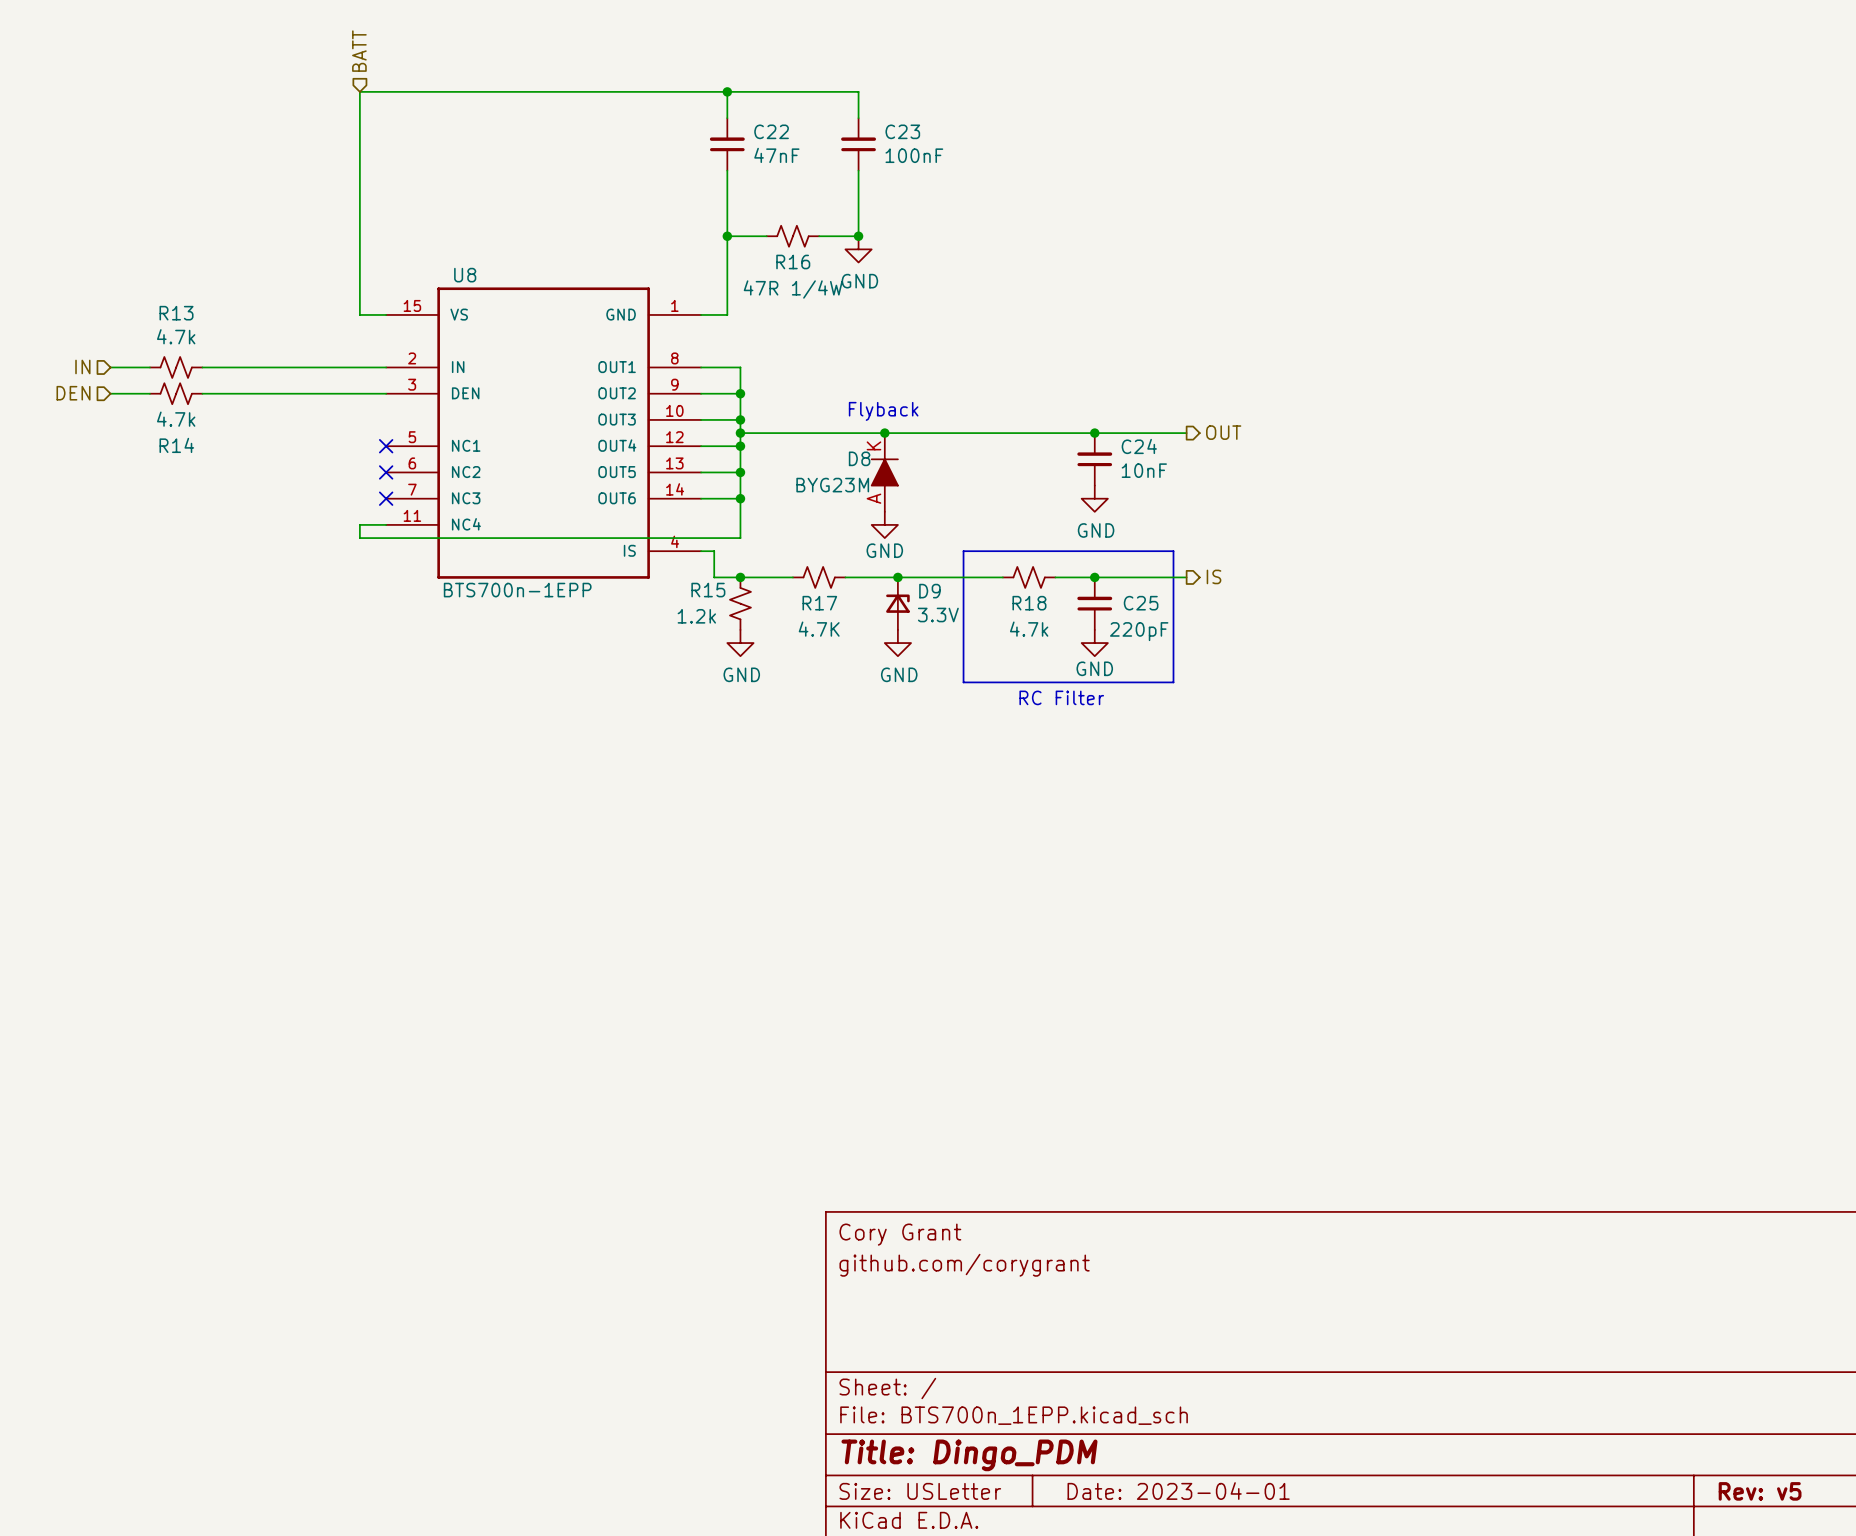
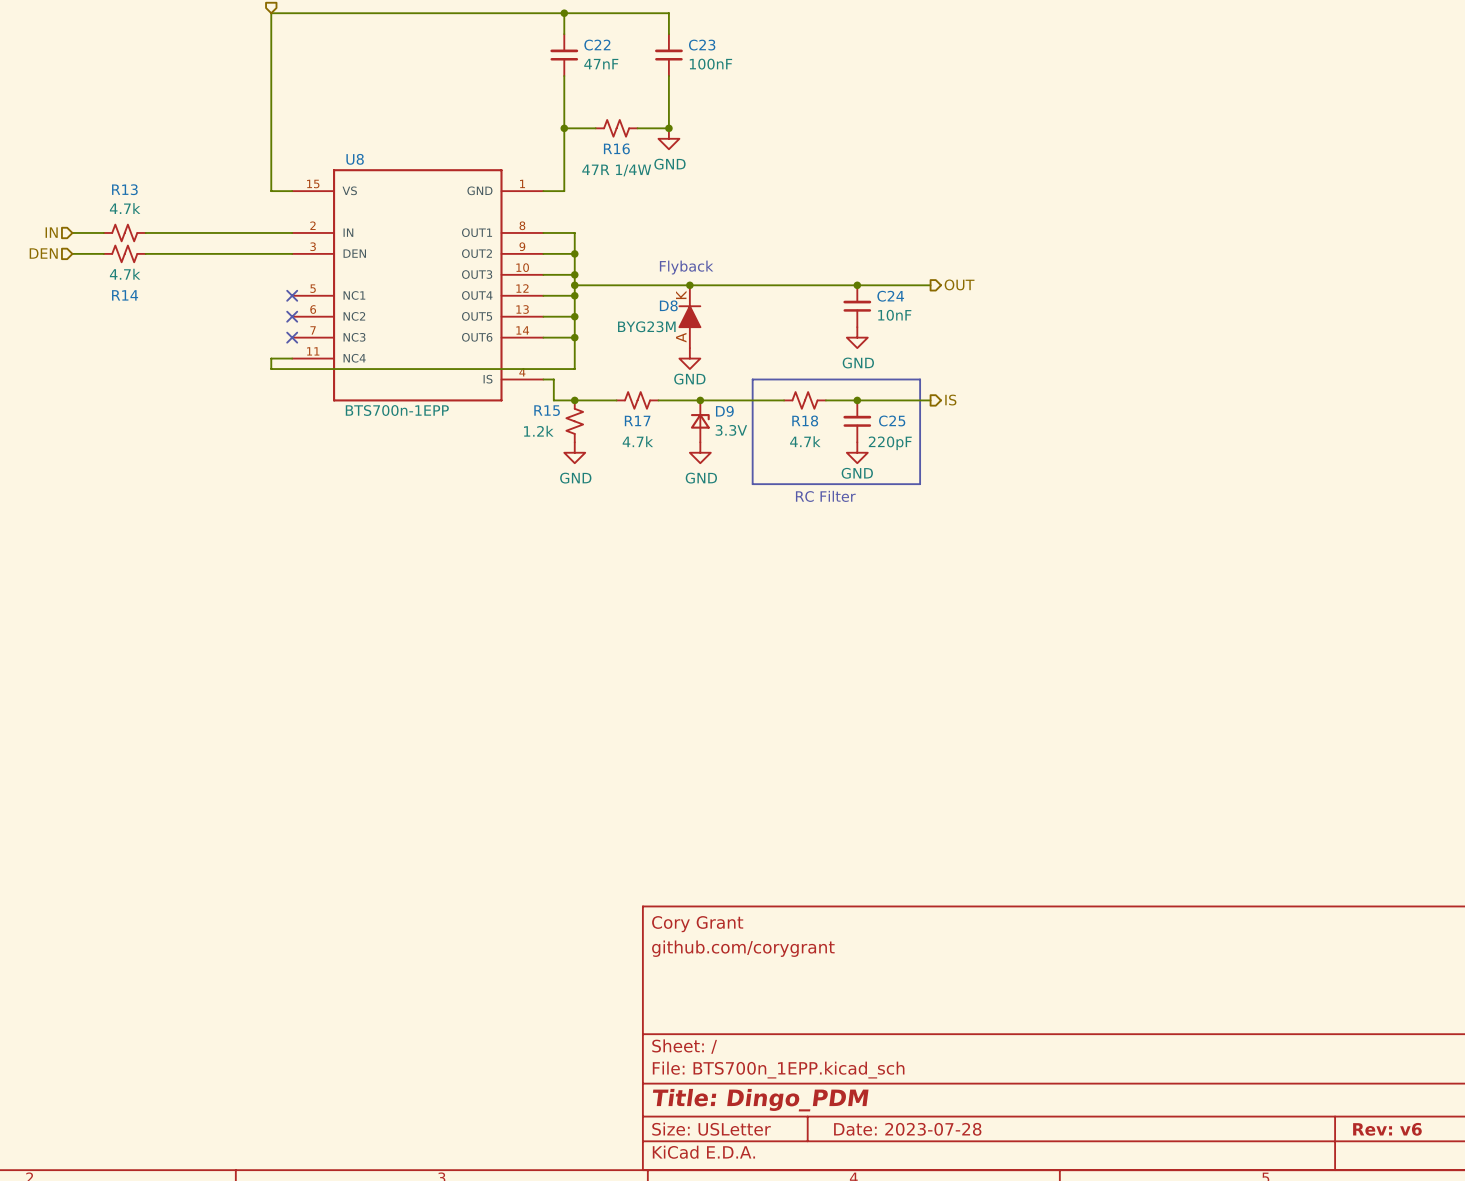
R17 value: 4.7K (819, 629) -> 4.7k (637, 441)
title block: Date: 2023-04-01 (1178, 1491) -> Date: 2023-07-28 (907, 1129)
title block: Rev: v5 (1760, 1491) -> Rev: v6 (1387, 1129)

